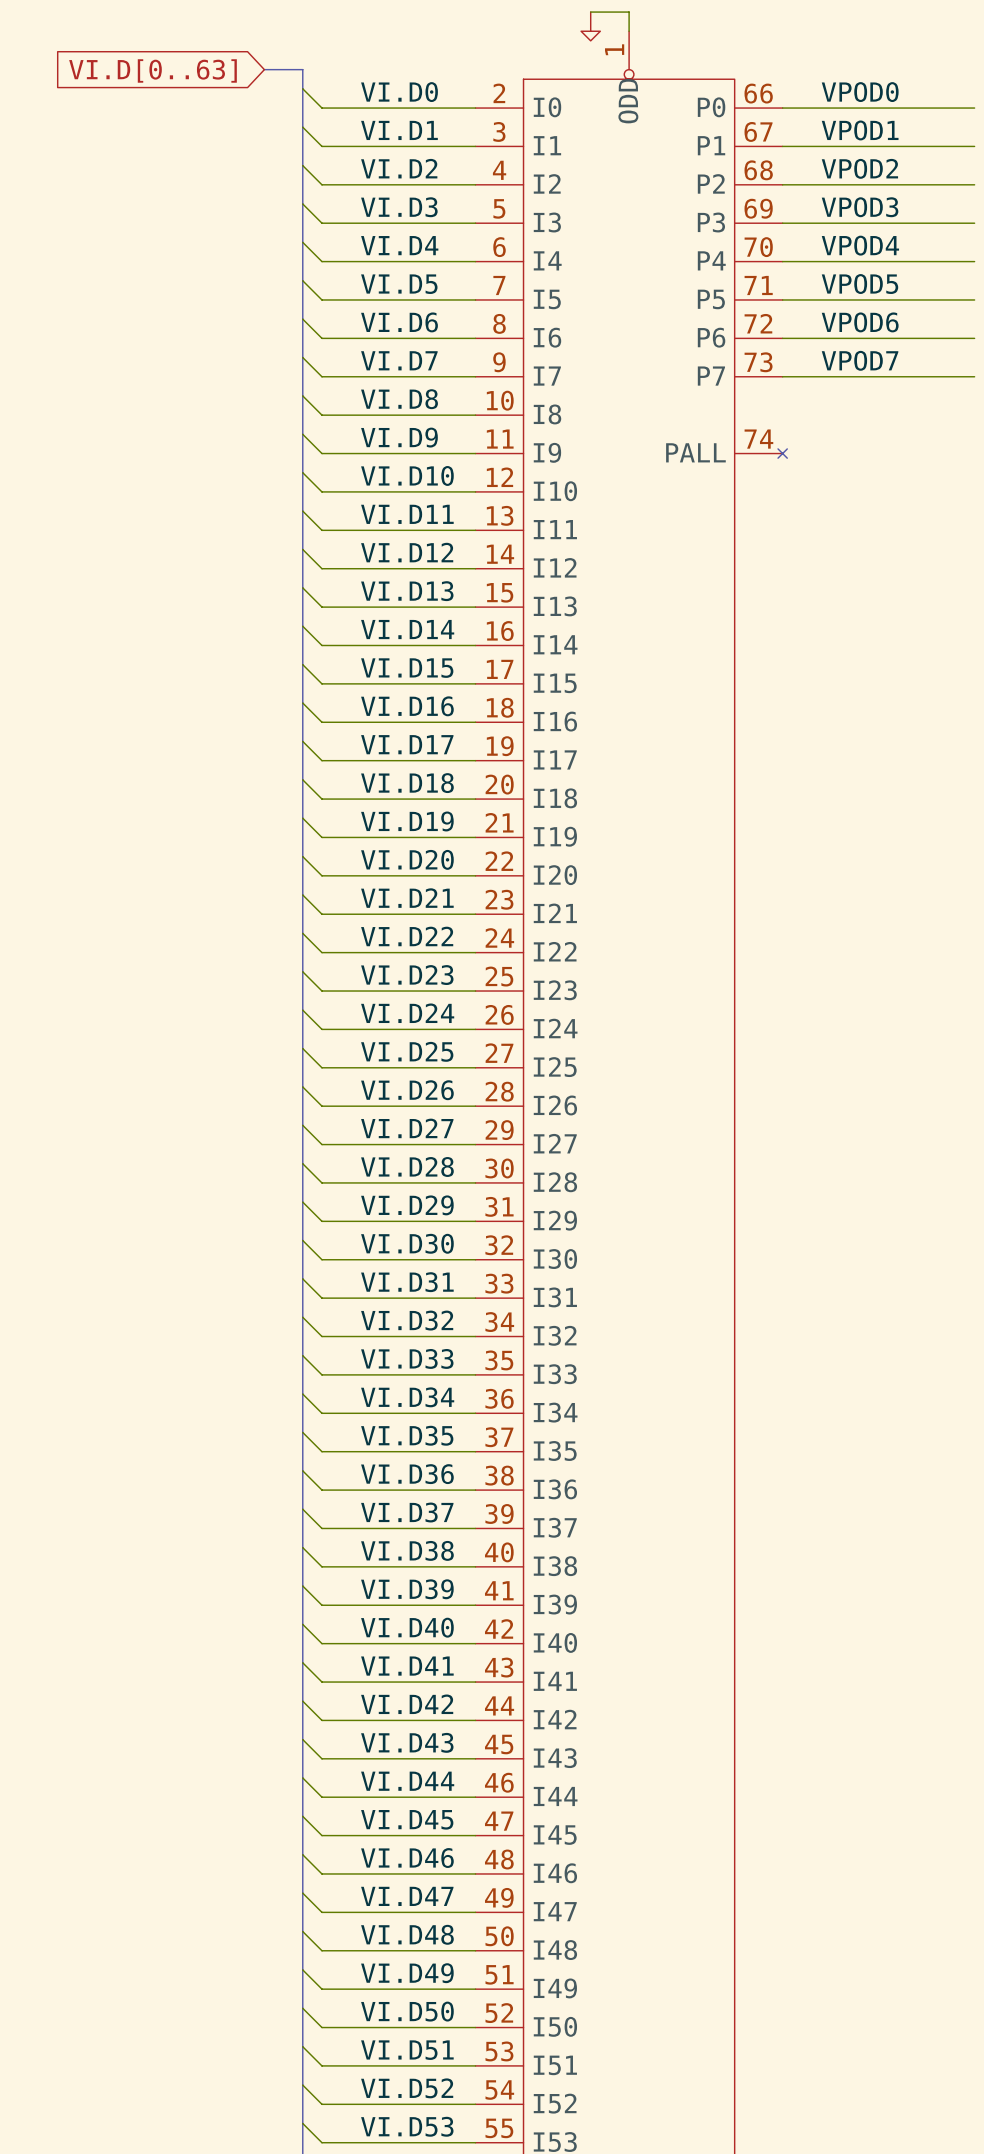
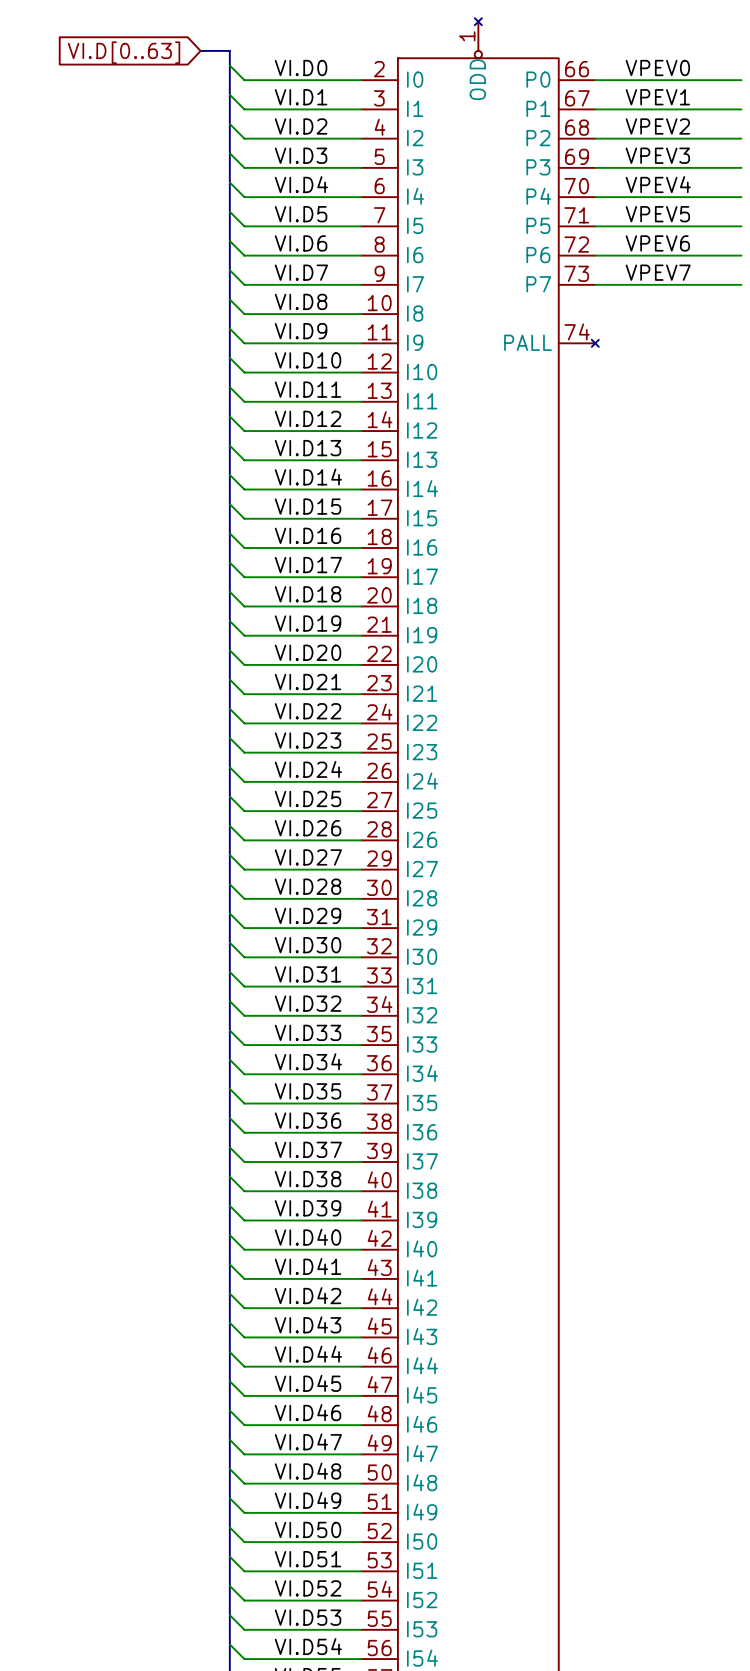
wire: (590, 12) (629, 12) (629, 31) -> none
power symbol: (590, 26) -> none
no-connect mark: none -> (478, 21)
label: VPOD0 (860, 92) -> VPEV0 (657, 68)
label: VPOD1 (860, 130) -> VPEV1 (657, 97)
label: VPOD2 (859, 168) -> VPEV2 (657, 126)
label: VPOD3 (860, 207) -> VPEV3 (657, 155)
label: VPOD4 (860, 245) -> VPEV4 (658, 184)
label: VPOD5 (859, 284) -> VPEV5 (657, 214)
label: VPOD6 (860, 322) -> VPEV6 (657, 243)
label: VPOD7 (860, 360) -> VPEV7 (658, 272)

